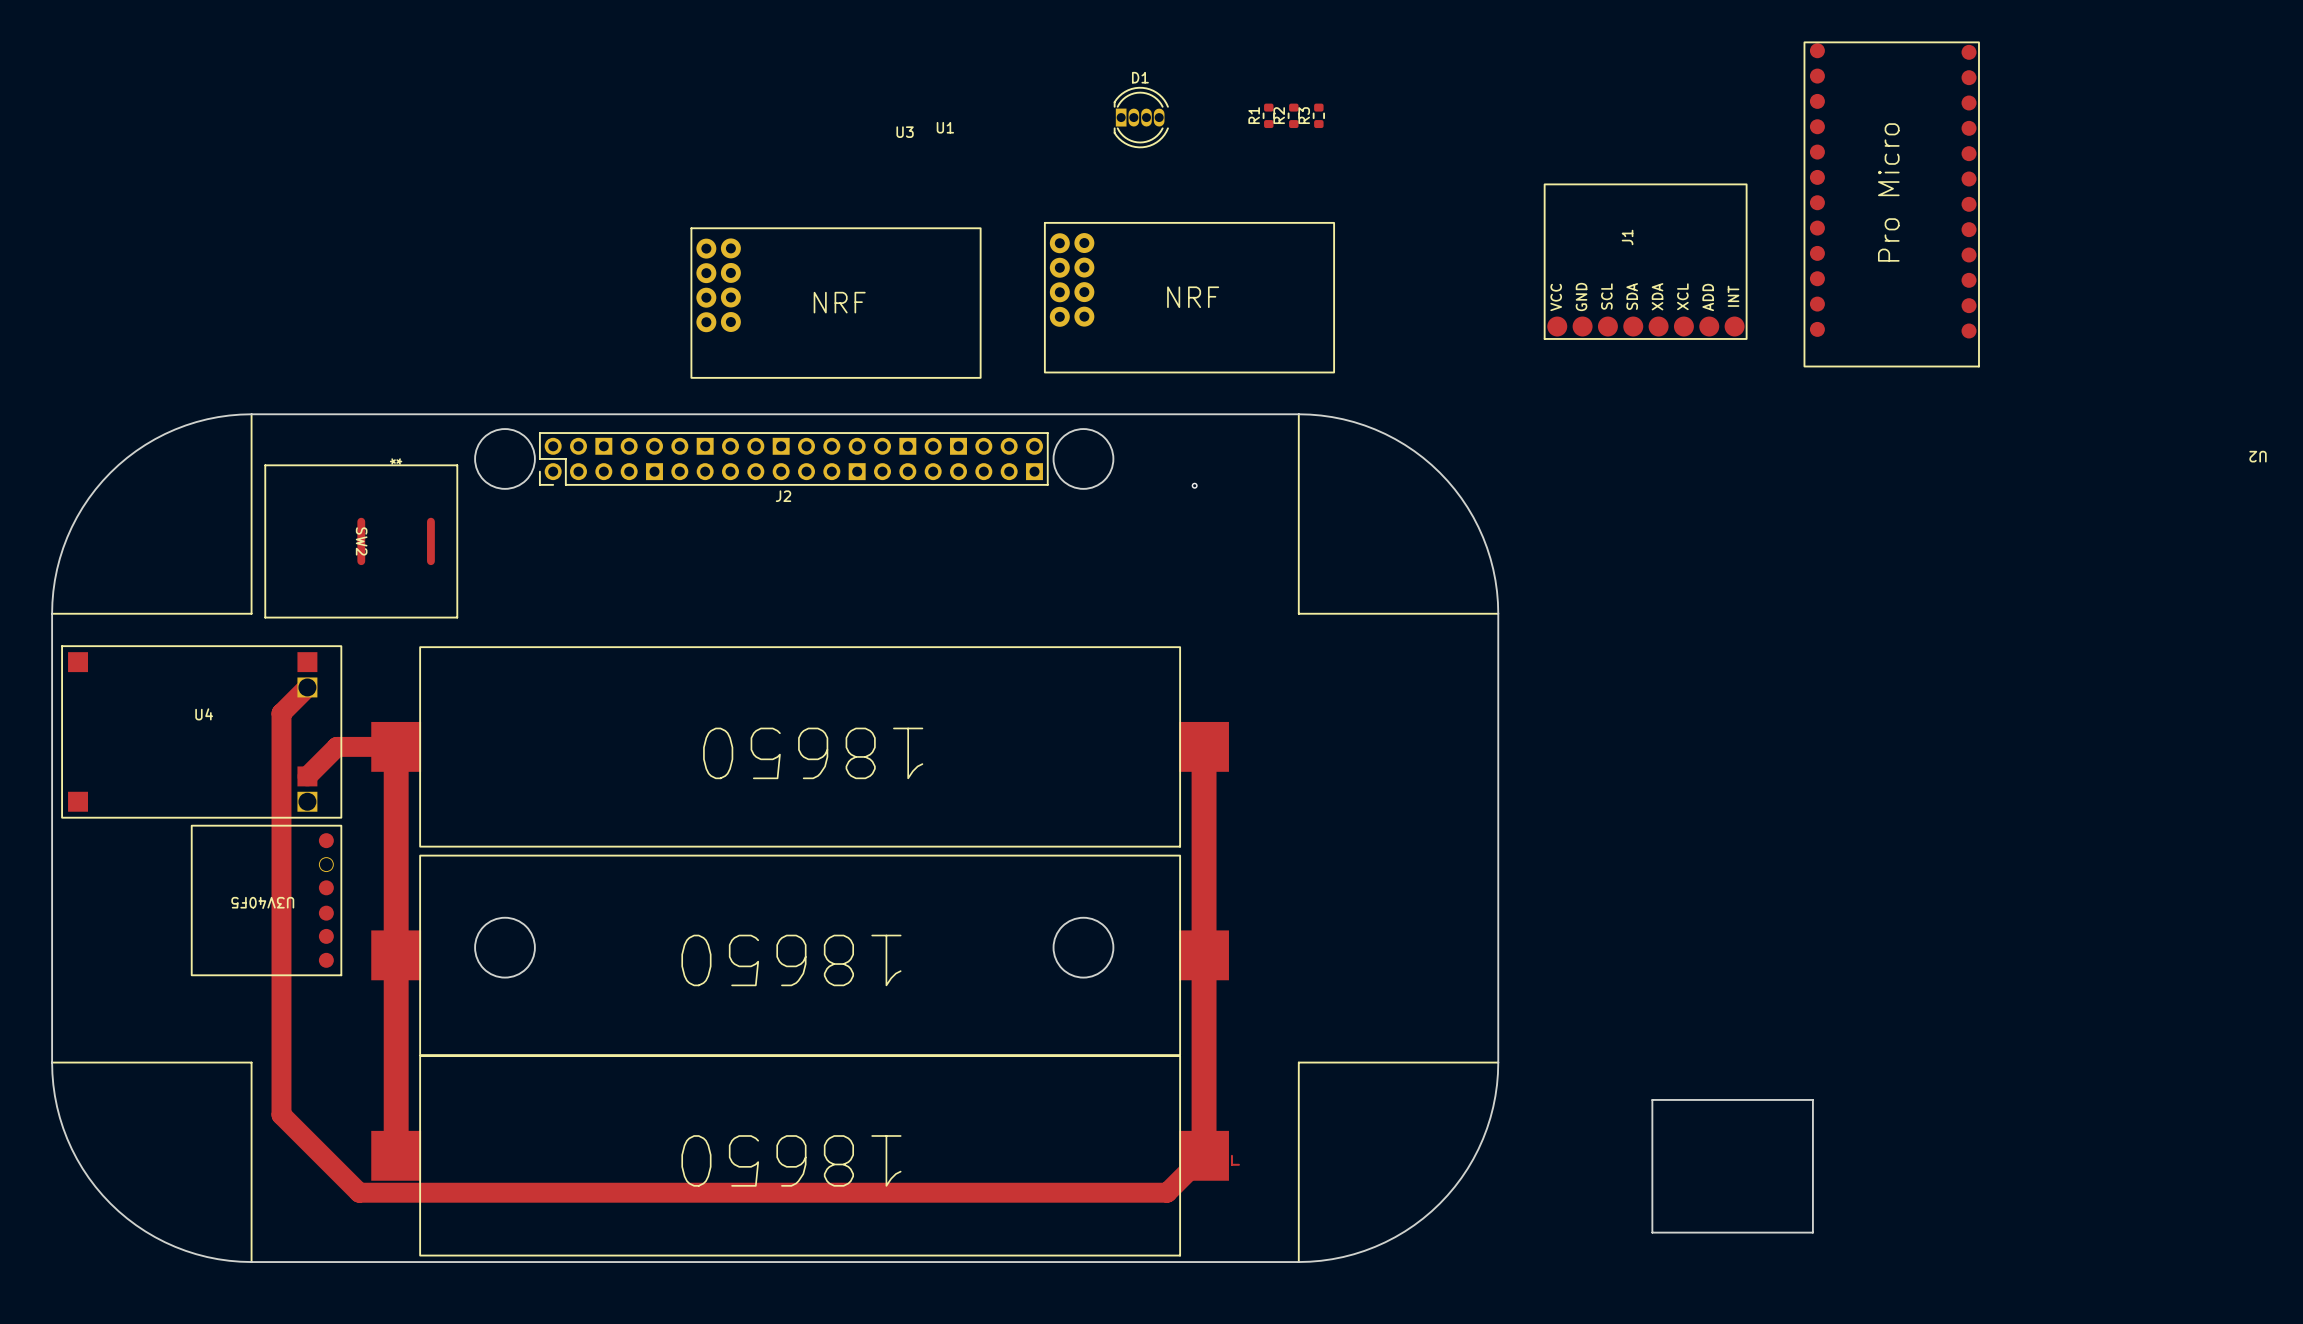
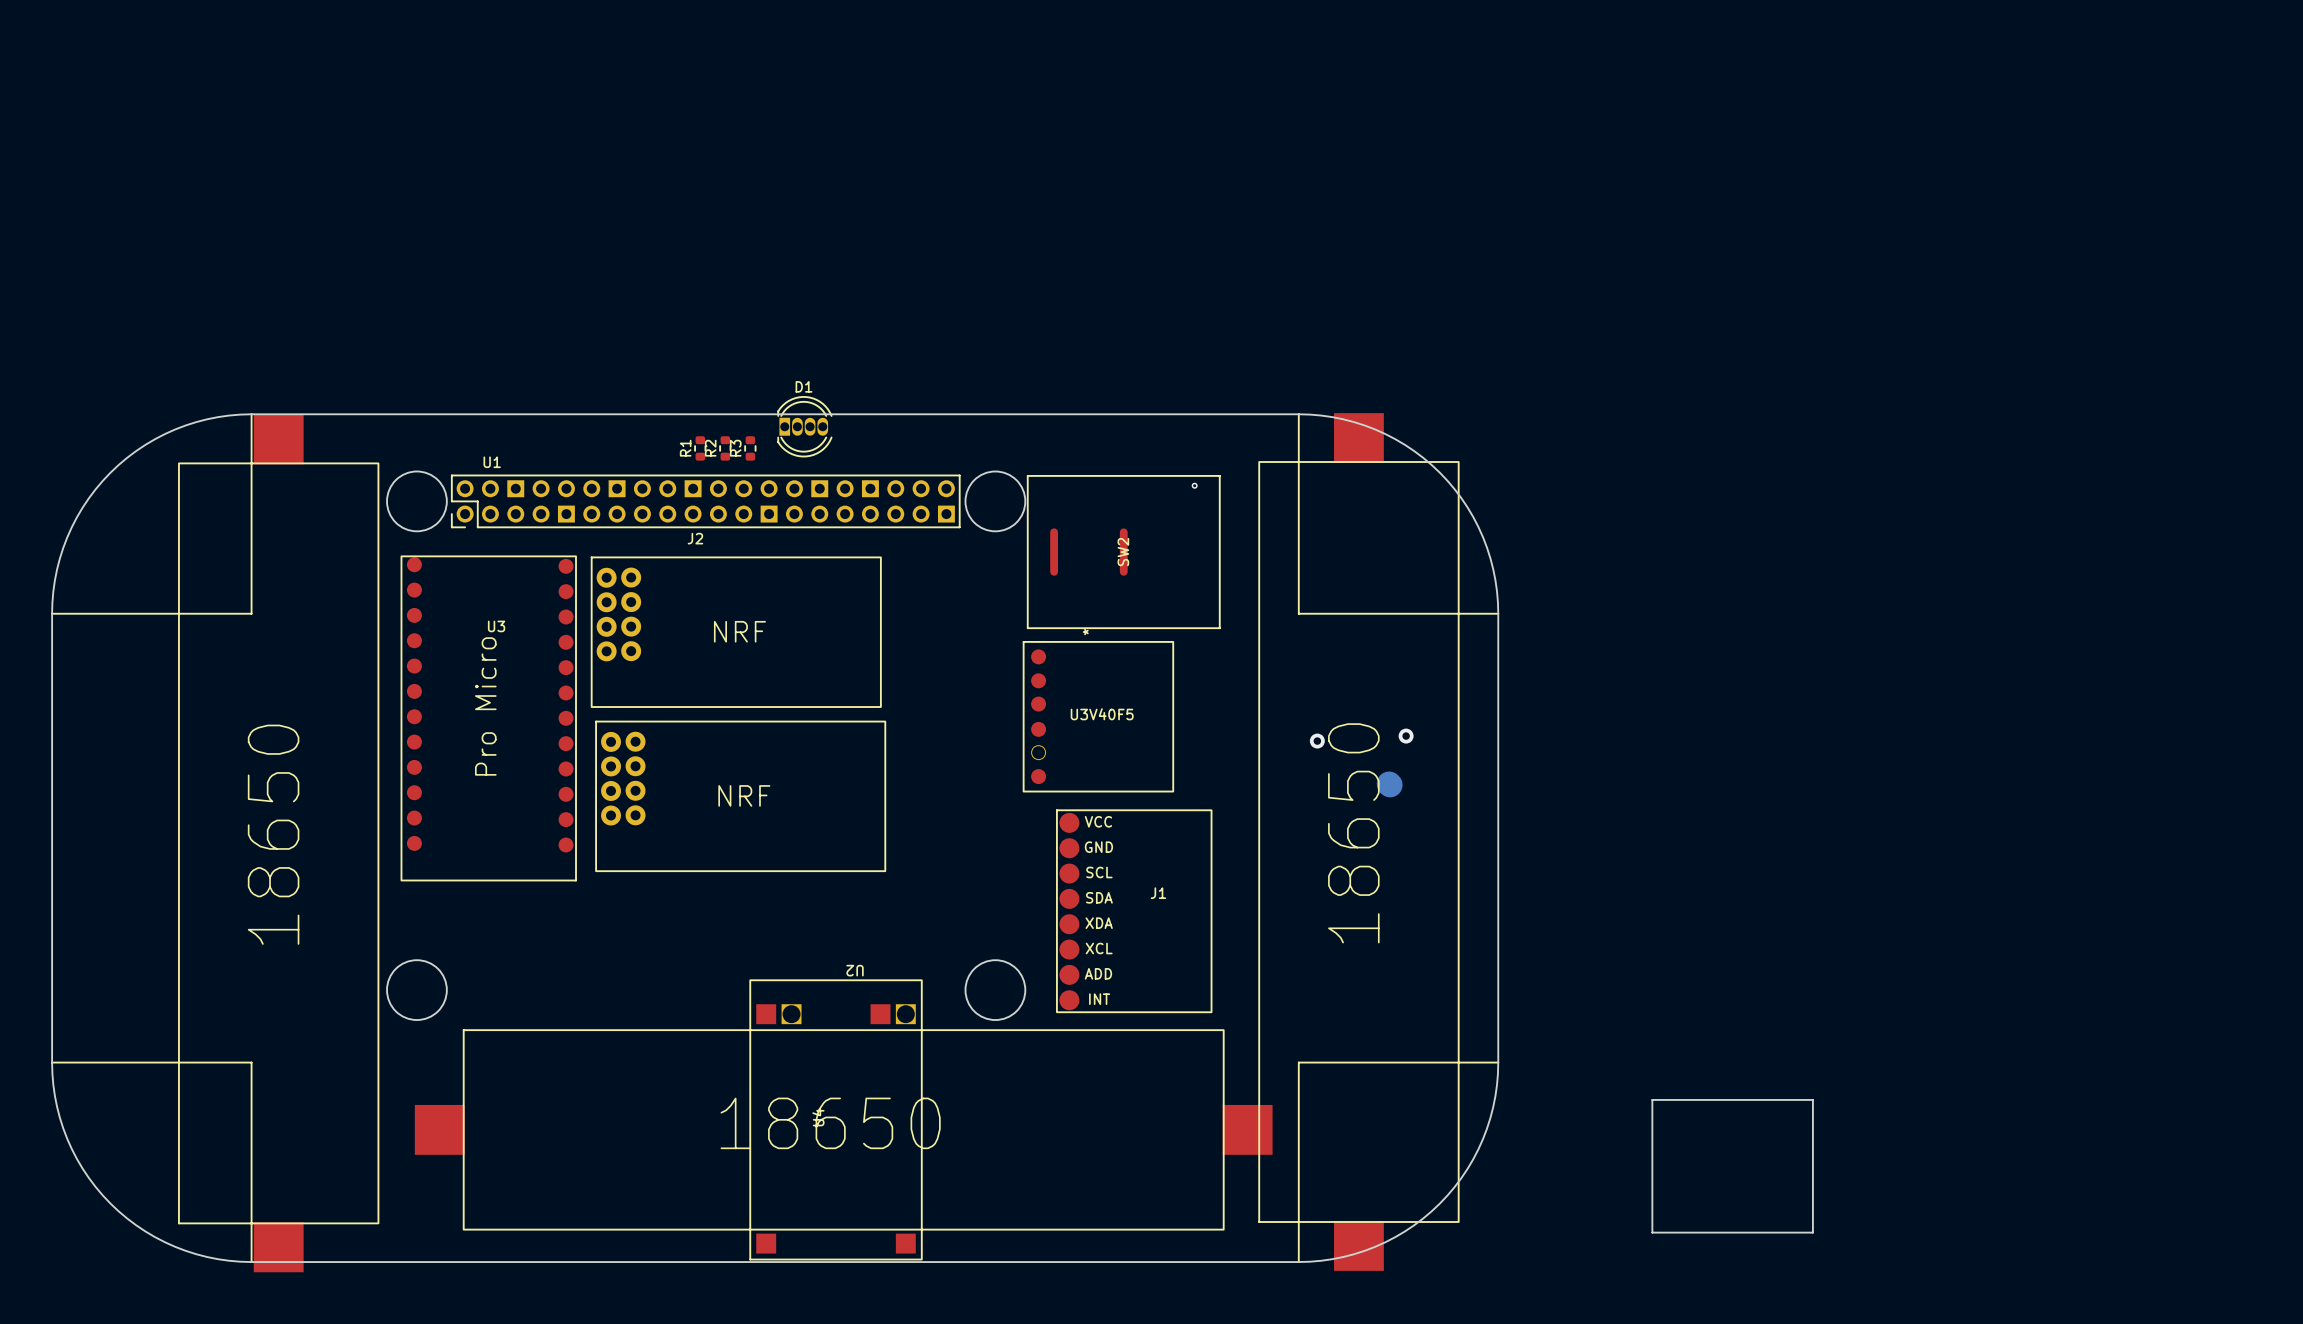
R1 position: (1268, 115) -> (700, 448)
R2 position: (1293, 115) -> (725, 448)
R3 position: (1318, 115) -> (750, 448)
D1 position: (1141, 117) -> (804, 426)
U3 name position: U3 (905, 132) -> U3 (496, 626)
U2 position: (1891, 204) -> (488, 718)
J1 rotation: 0° (1645, 261) -> 90° clockwise (1134, 911)
J1 position: (1645, 261) -> (1134, 911)
U1 position: (1189, 297) -> (736, 632)
U3 position: (836, 303) -> (740, 796)
SW2 rotation: 0° (361, 541) -> 180° (1123, 552)
SW2 position: (361, 541) -> (1123, 552)
top track: (307, 687) (281, 713) (281, 1114) (359, 1192) (1167, 1192) (1204, 1155) (1204, 746) -> none
J2 position: (794, 703) -> (706, 745)
part: none -> (1098, 716)
U4 rotation: 0° (201, 731) -> 90° counterclockwise (836, 1119)
U4 position: (201, 731) -> (836, 1119)
via: none -> (1406, 736)
via: none -> (1317, 741)
part: (800, 746) -> none
top track: (307, 776) (336, 746) (396, 746) (396, 1155) -> none
bottom track: none -> (1389, 783) (1390, 784)
part: none -> (1358, 841)
part: none -> (278, 843)
part: (266, 900) -> none
part: (800, 955) -> none
part: none -> (843, 1129)
part: (800, 1155) -> none
top track: (1231, 1155) (1231, 1164) (1238, 1164) -> none

